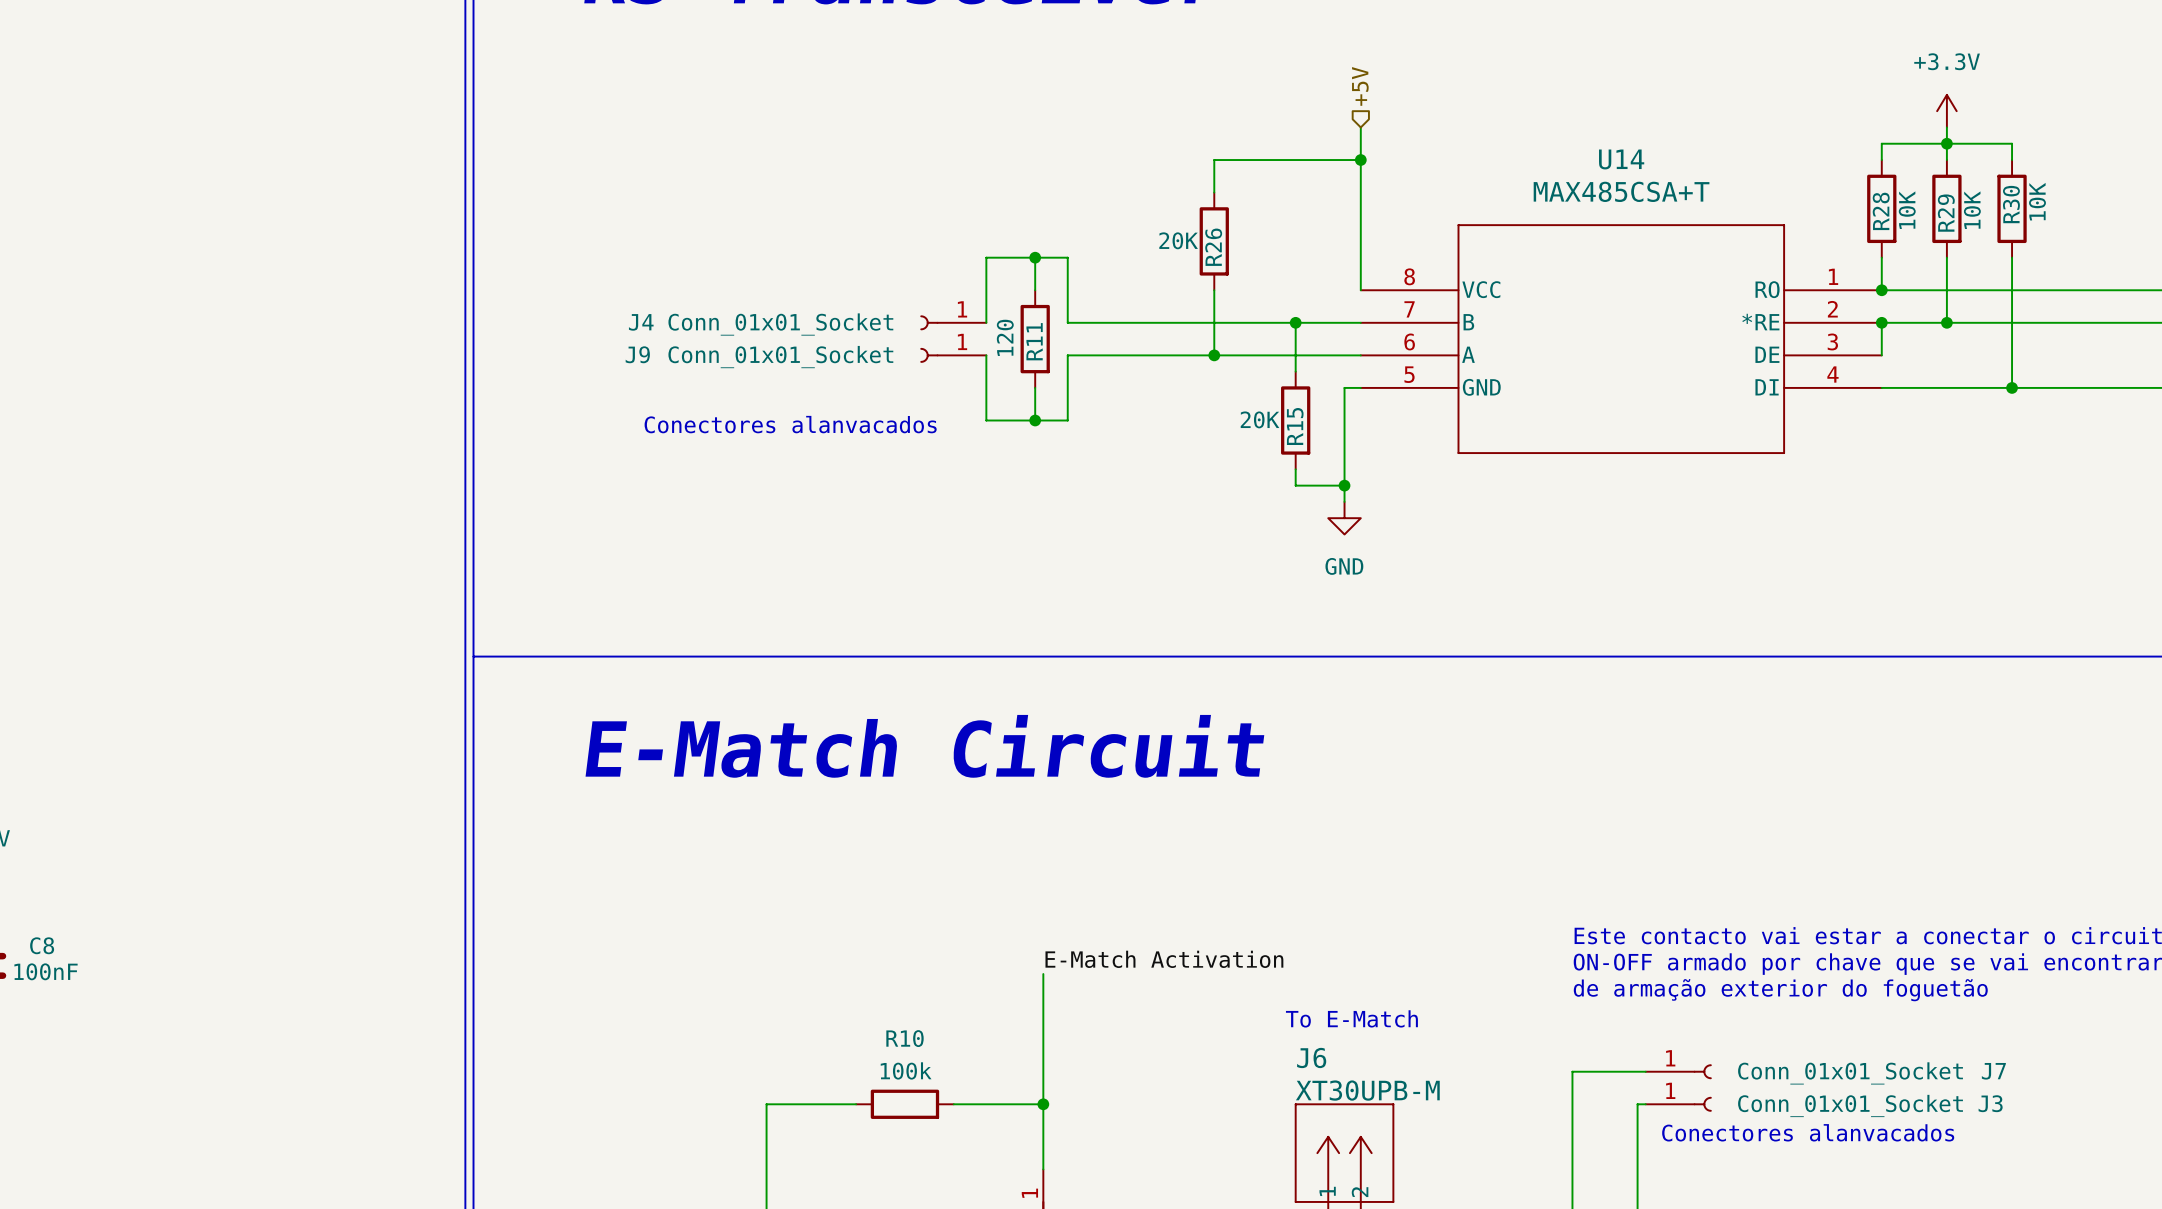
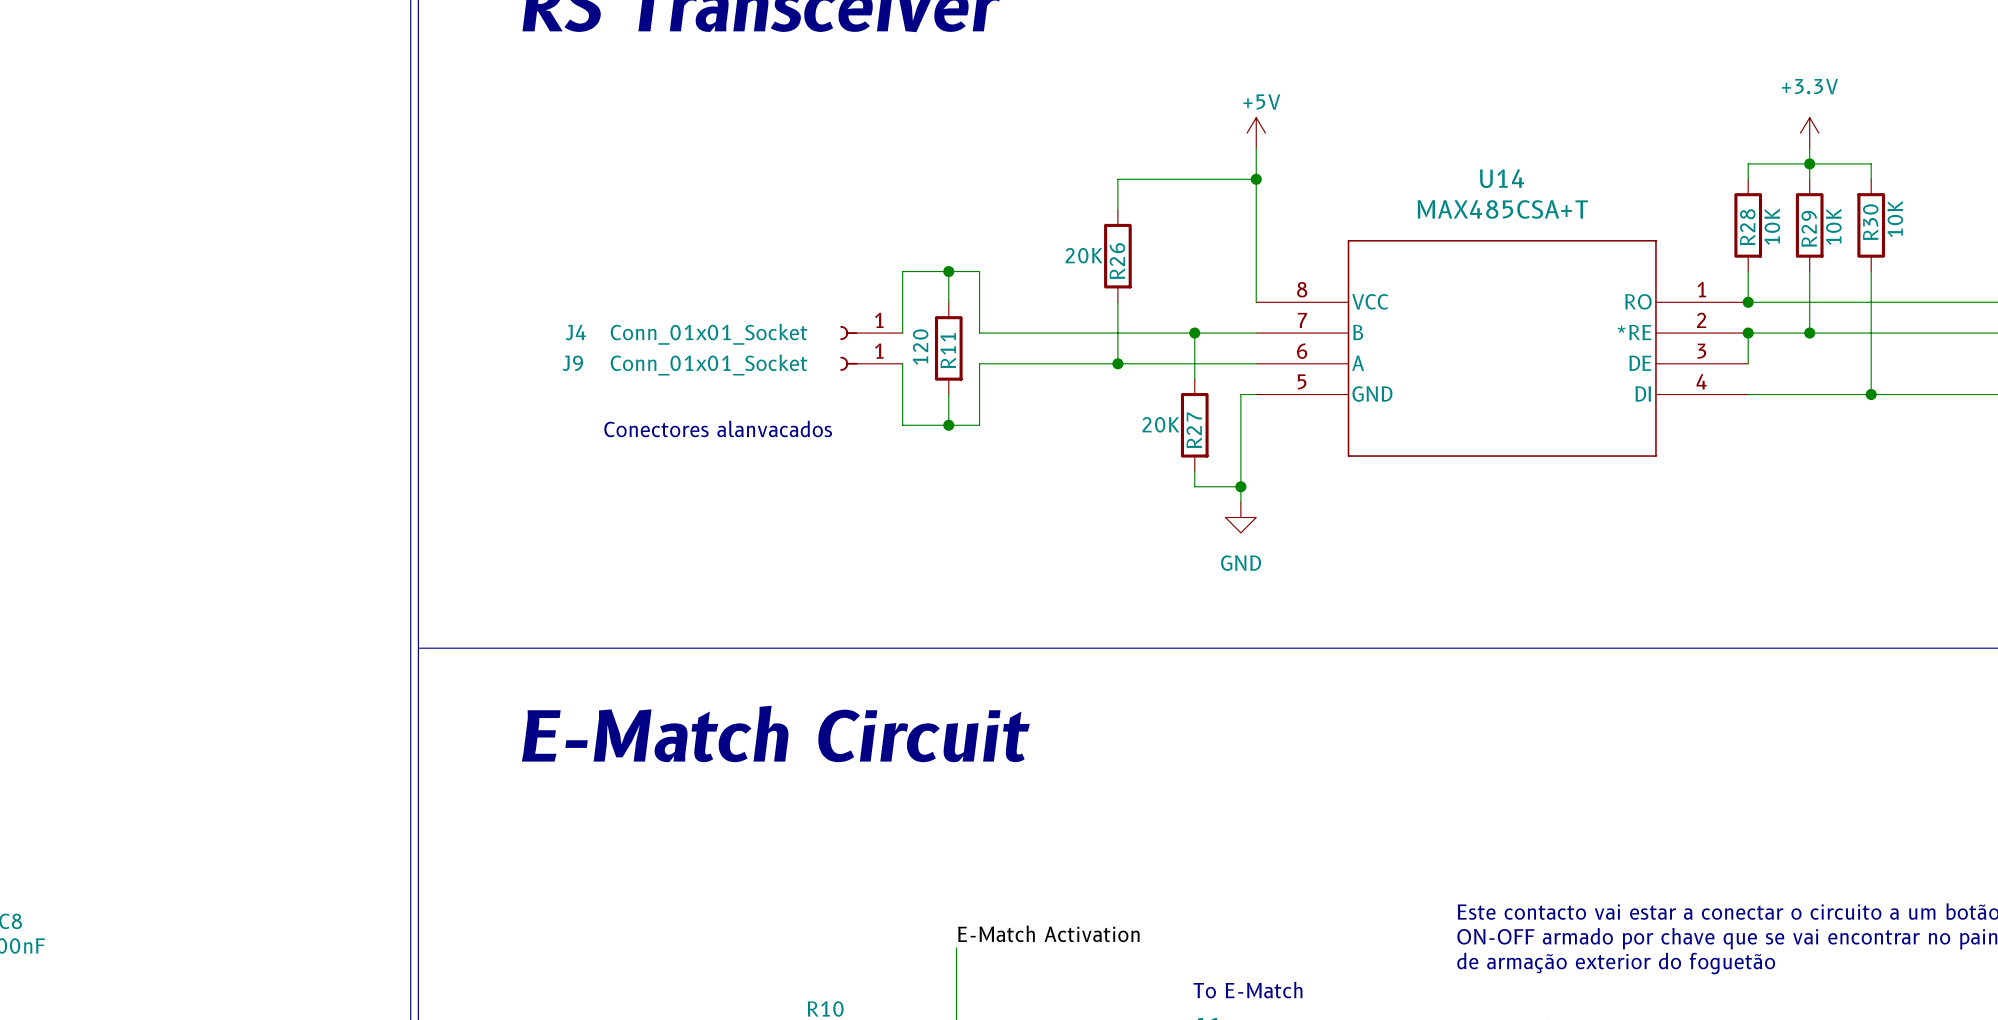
hierarchical label: +5V (1360, 86) -> none
power symbol: none -> +5V (1256, 133)
R15 name: R15 (1295, 426) -> R27 (1194, 430)

